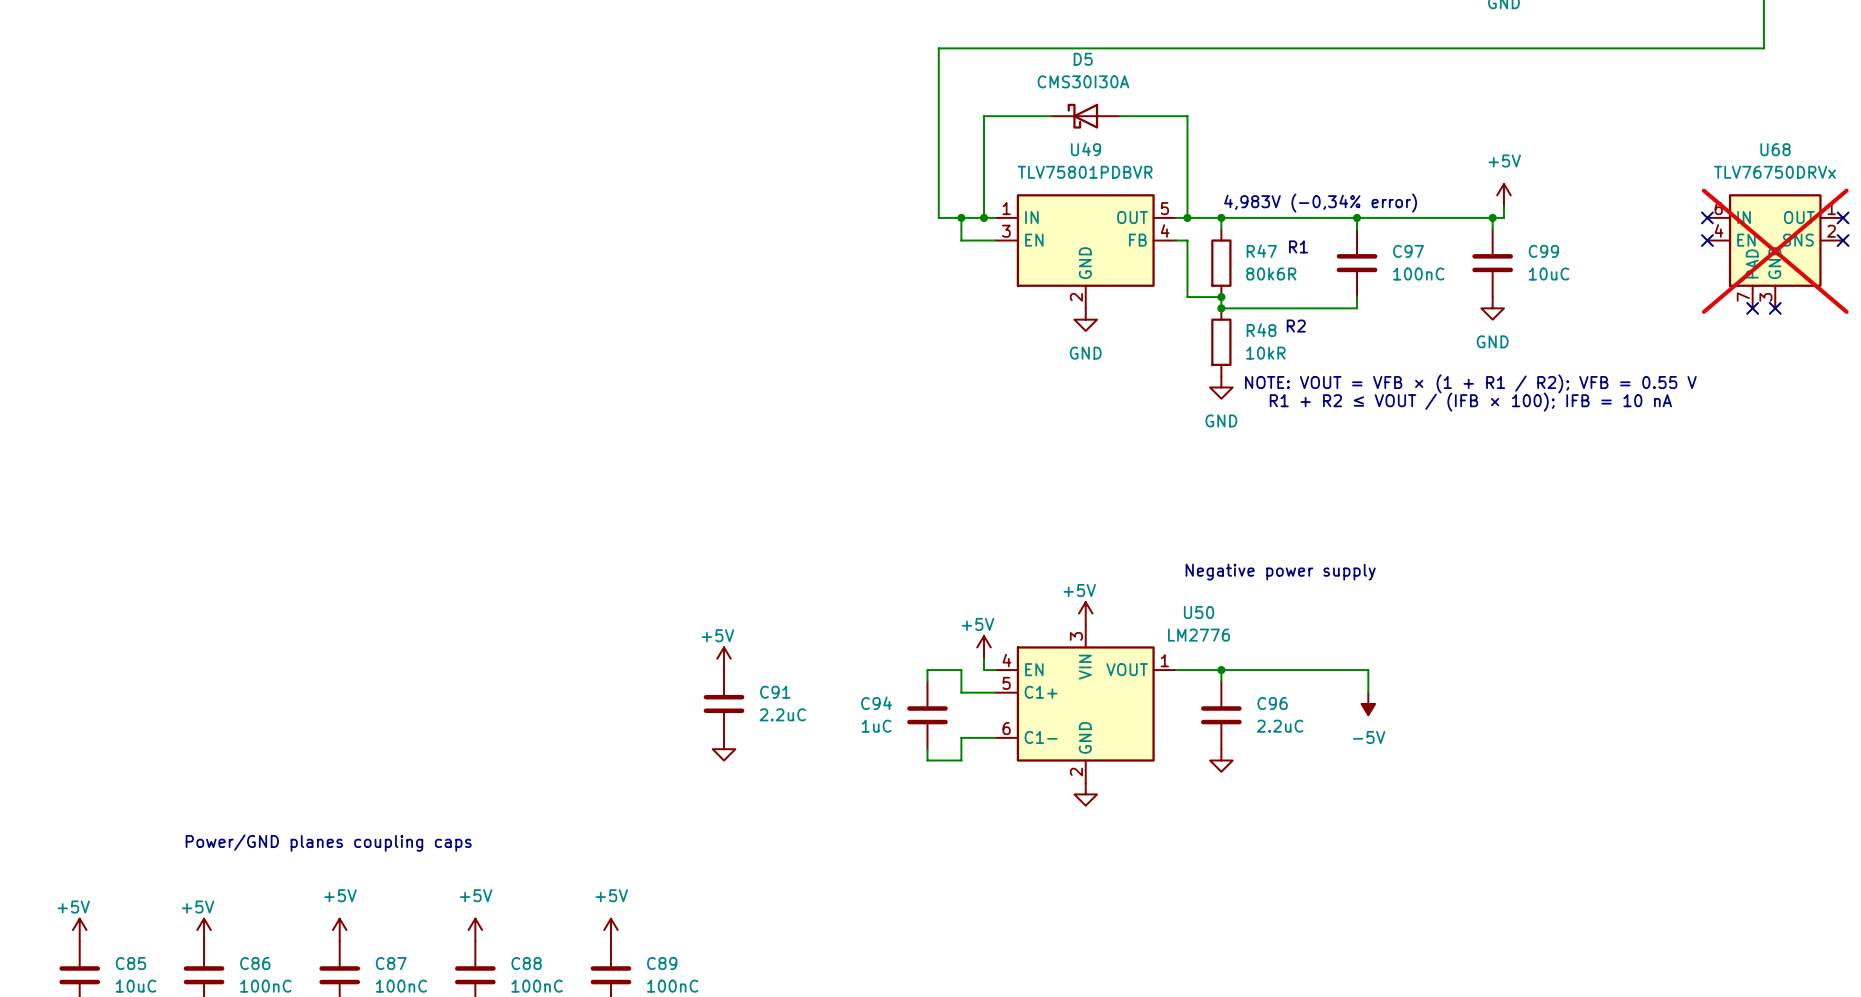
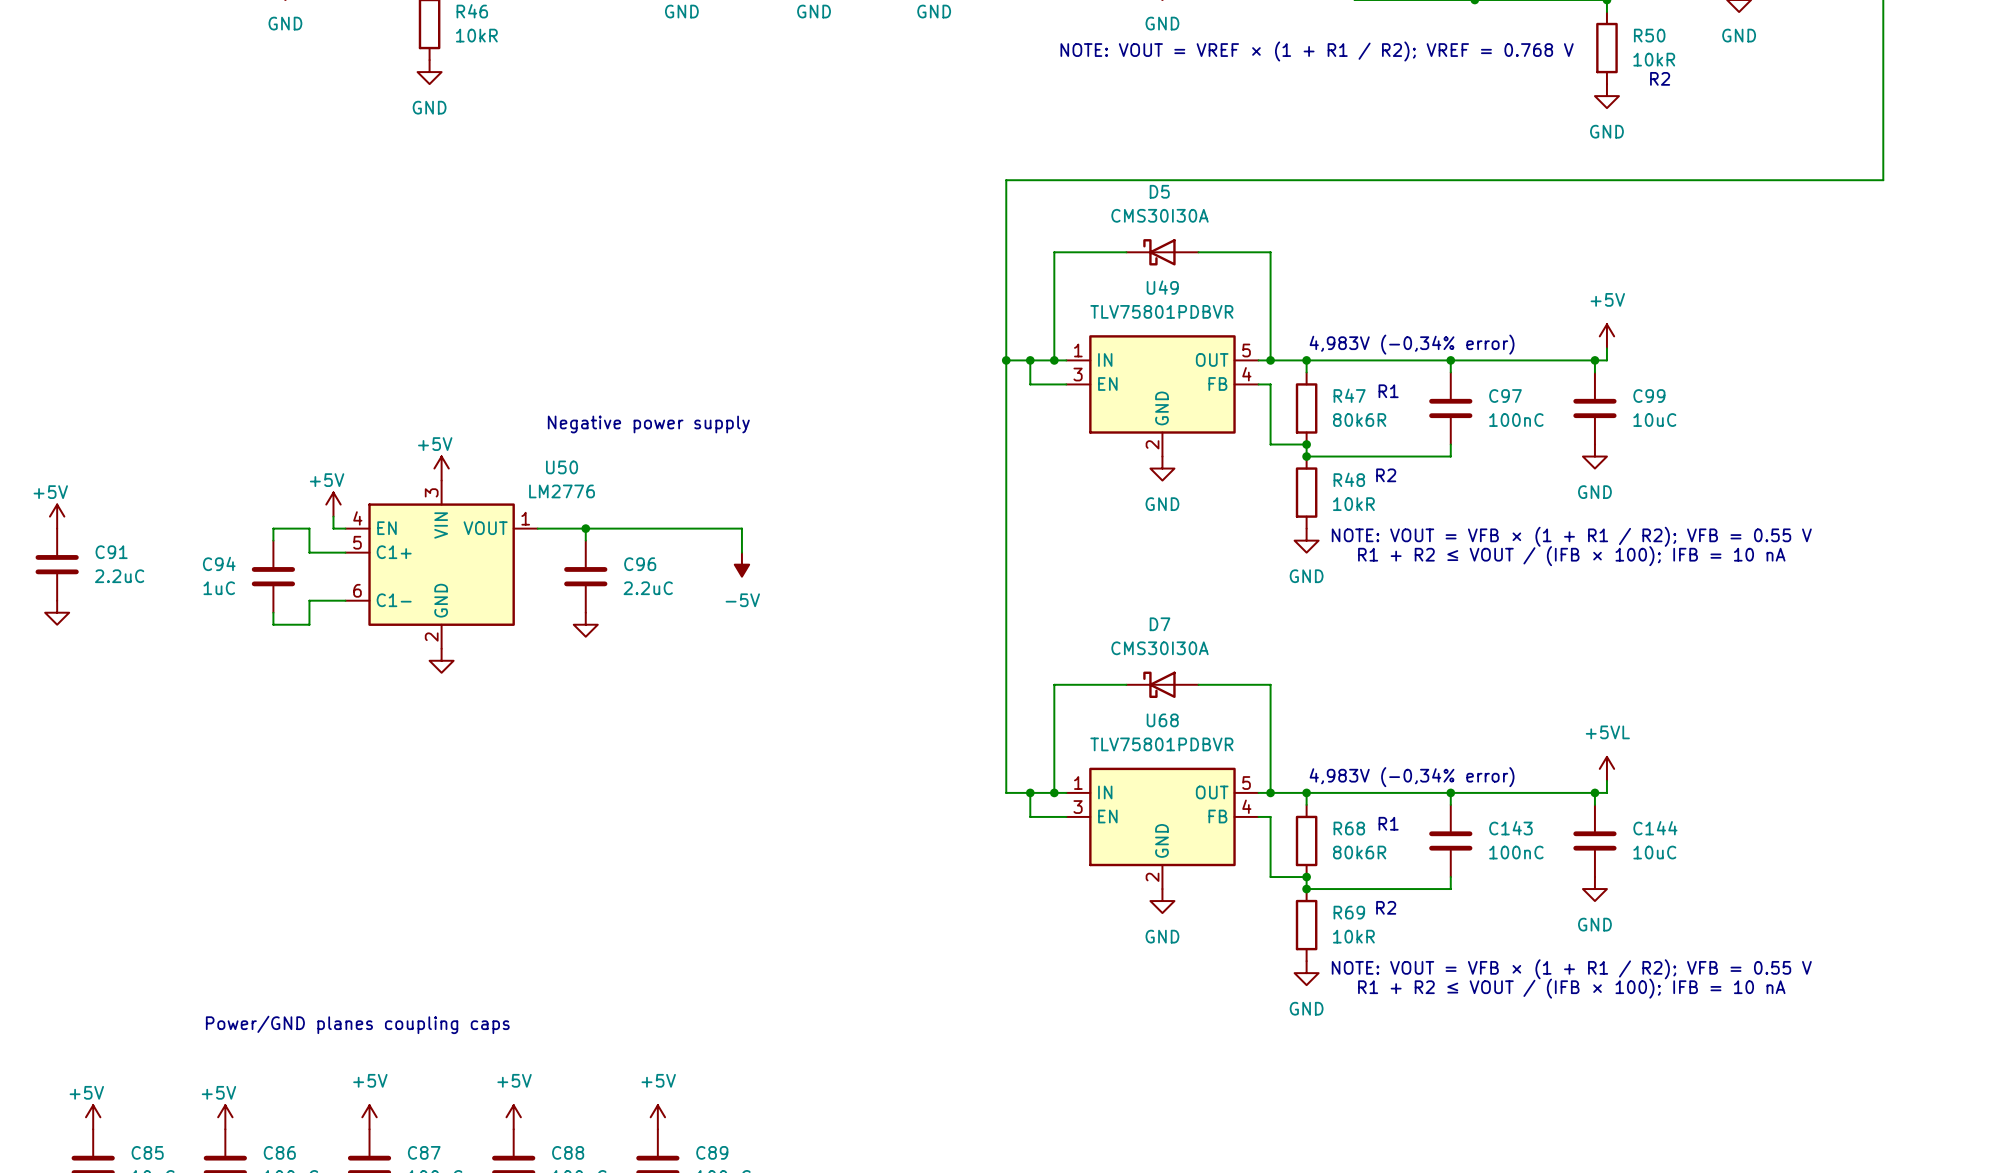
U68 value: TLV76750DRVx (1774, 172) -> TLV75801PDBVR (1161, 744)
U68 symbol: [1707, 194, 1844, 309] -> [1066, 767, 1259, 890]
wire: none -> (1006, 360) (1006, 792) (1066, 792)
junction: none -> (1006, 360)
no-connect mark: (1707, 217) -> none
no-connect mark: (1843, 217) -> none
no-connect mark: (1707, 240) -> none
no-connect mark: (1843, 240) -> none
U68 do-not-place cross: (1775, 251) -> none
text: none -> Negative power supply (648, 424)
no-connect mark: (1752, 308) -> none
no-connect mark: (1775, 308) -> none
power symbol: none -> +5V (441, 468)
power symbol: none -> +5V (333, 504)
power symbol: none -> +5V (57, 516)
wire: none -> (333, 516) (333, 528) (345, 528)
wire: none -> (537, 528) (741, 528) (741, 552)
wire: none -> (585, 528) (585, 540)
junction: none -> (585, 528)
wire: none -> (273, 540) (273, 528) (309, 528) (309, 552) (345, 552)
power symbol: none -> -5V (741, 564)
wire: none -> (345, 600) (309, 600) (309, 624) (273, 624) (273, 612)
power symbol: none -> (57, 612)
power symbol: none -> (585, 624)
power symbol: none -> (441, 660)
wire: none -> (1126, 684) (1054, 684) (1054, 792)
D7: none -> CMS30I30A (1162, 684)
wire: none -> (1198, 684) (1270, 684) (1270, 792)
text: Negative power supply (1280, 572) -> none
power symbol: none -> +5VL (1606, 768)
text: none -> 4,983V (-0,34% error) (1412, 777)
power symbol: +5V (1085, 613) -> none
wire: none -> (1606, 780) (1606, 792) (1258, 792)
wire: none -> (1030, 792) (1030, 816) (1066, 816)
junction: none -> (1030, 792)
junction: none -> (1054, 792)
junction: none -> (1270, 792)
junction: none -> (1306, 792)
wire: none -> (1450, 792) (1450, 804)
junction: none -> (1450, 792)
wire: none -> (1594, 792) (1594, 804)
junction: none -> (1594, 792)
power symbol: +5V (984, 647) -> none
wire: none -> (1258, 816) (1270, 816) (1270, 877) (1306, 877) (1306, 889) (1450, 889) (1450, 877)
text: none -> R1 (1388, 823)
power symbol: +5V (724, 658) -> none
wire: (984, 658) (984, 670) (995, 670) -> none
wire: (1176, 670) (1368, 670) (1368, 692) -> none
wire: (1221, 670) (1221, 681) -> (1306, 792) (1306, 804)
junction: (1221, 670) -> none
R68: none -> 80k6R (1306, 840)
C143: none -> 100nC (1450, 840)
C144: none -> 10uC (1594, 840)
wire: (927, 681) (927, 670) (961, 670) (961, 692) (995, 692) -> none
C91 position: (724, 703) -> (57, 564)
U50 position: (1085, 703) -> (441, 564)
junction: none -> (1306, 877)
power symbol: -5V (1368, 703) -> none
C94 position: (927, 715) -> (273, 576)
junction: none -> (1306, 889)
C96 position: (1221, 715) -> (585, 576)
power symbol: none -> GND (1594, 889)
power symbol: none -> GND (1162, 901)
text: none -> R2 (1386, 907)
wire: (995, 737) (961, 737) (961, 760) (927, 760) (927, 749) -> none
power symbol: (724, 749) -> none
R69: none -> 10kR (1306, 925)
power symbol: (1221, 760) -> none
text: none -> NOTE: VOUT = VFB × (1 + R1 / R2); VFB = 0.55 V (1571, 969)
power symbol: (1085, 794) -> none
power symbol: none -> GND (1306, 973)
text: none -> R1 + R2 ≤ VOUT / (IFB × 100); IFB = 10 nA (1571, 988)

